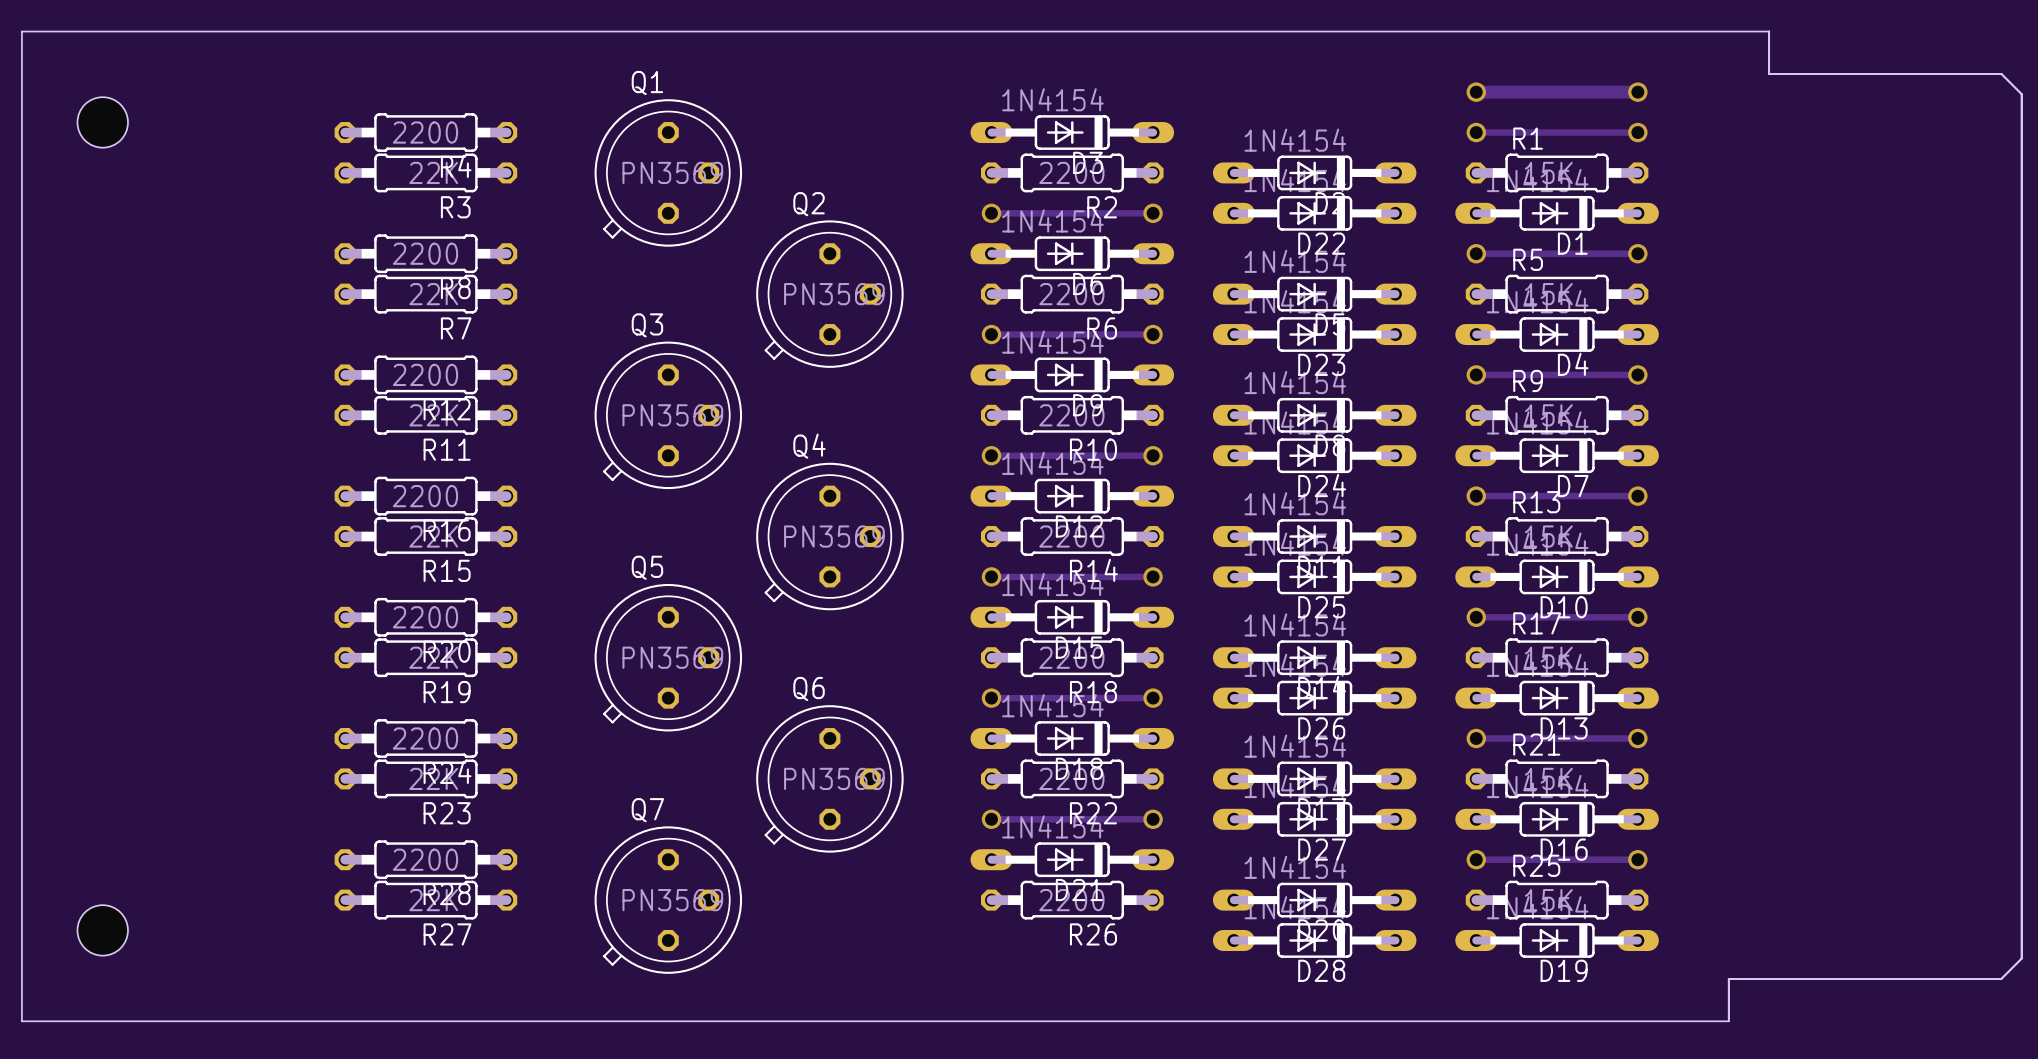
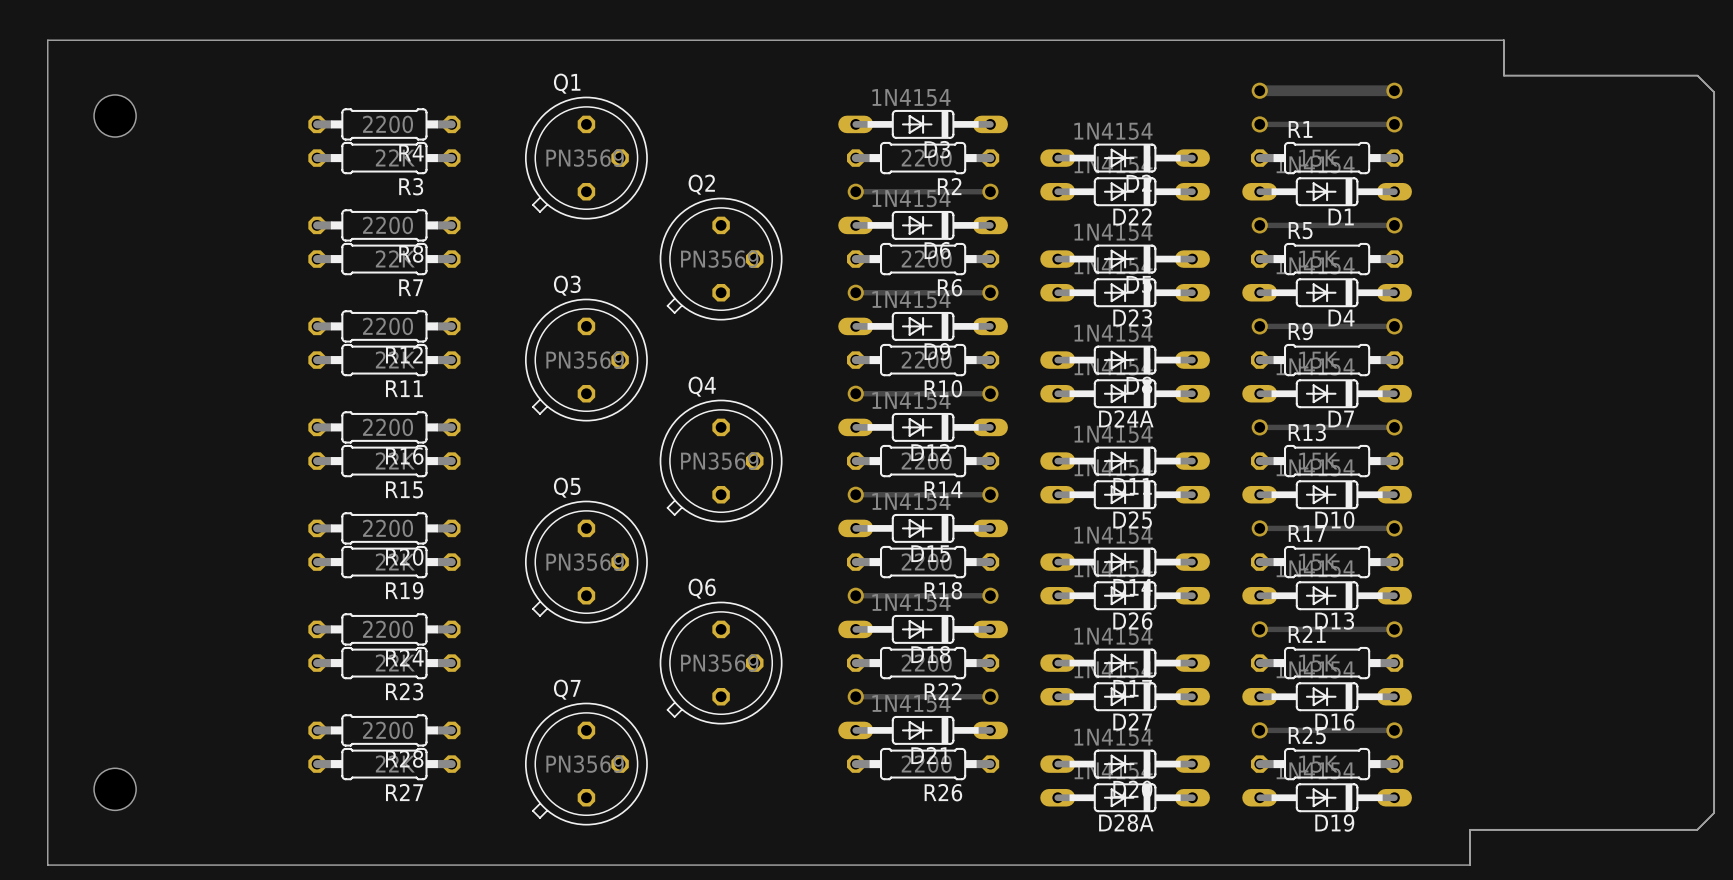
D24 name: D24 (1322, 485) -> D24A (1126, 418)
D28 name: D28 (1321, 970) -> D28A (1126, 823)

